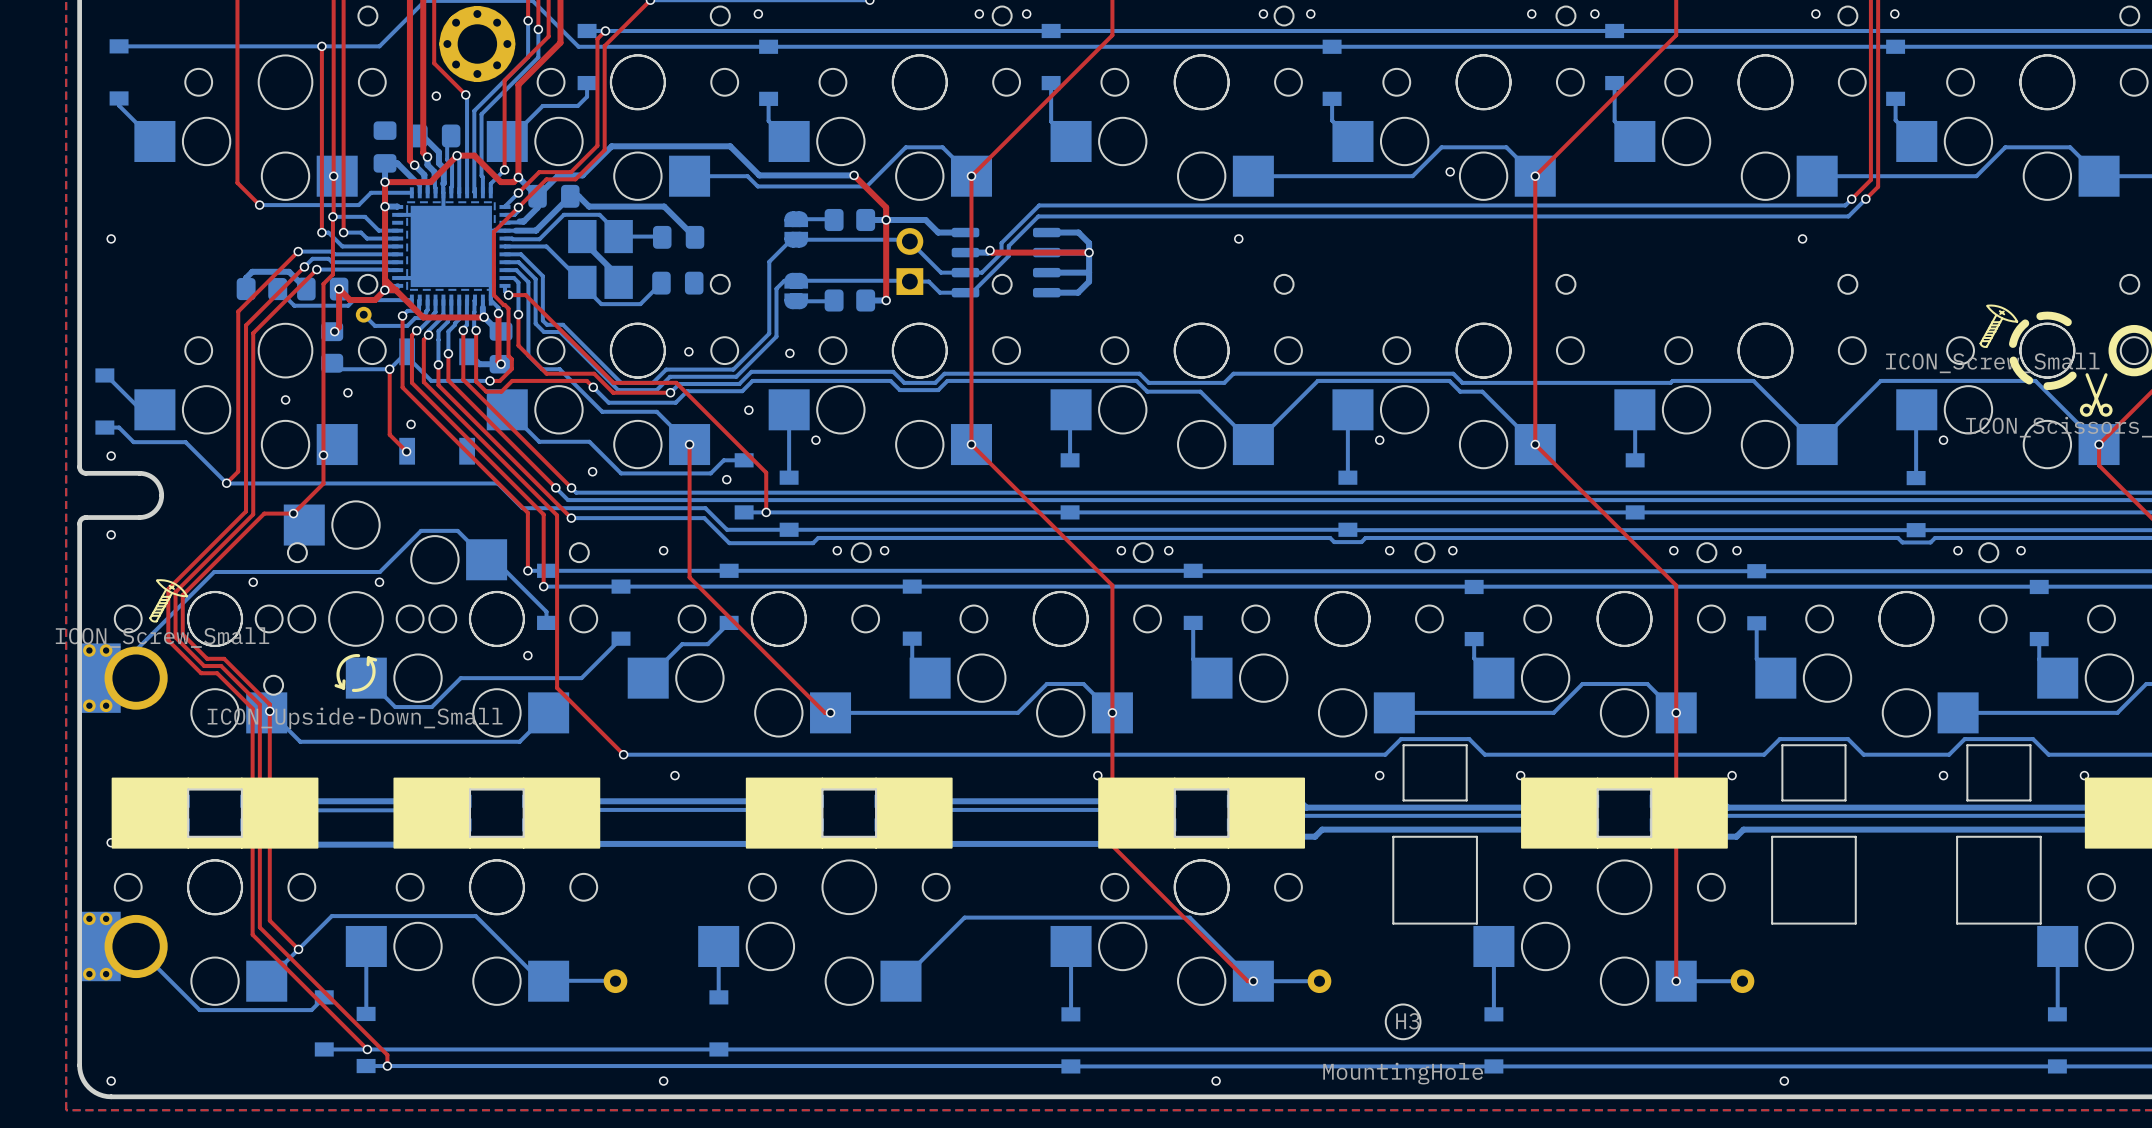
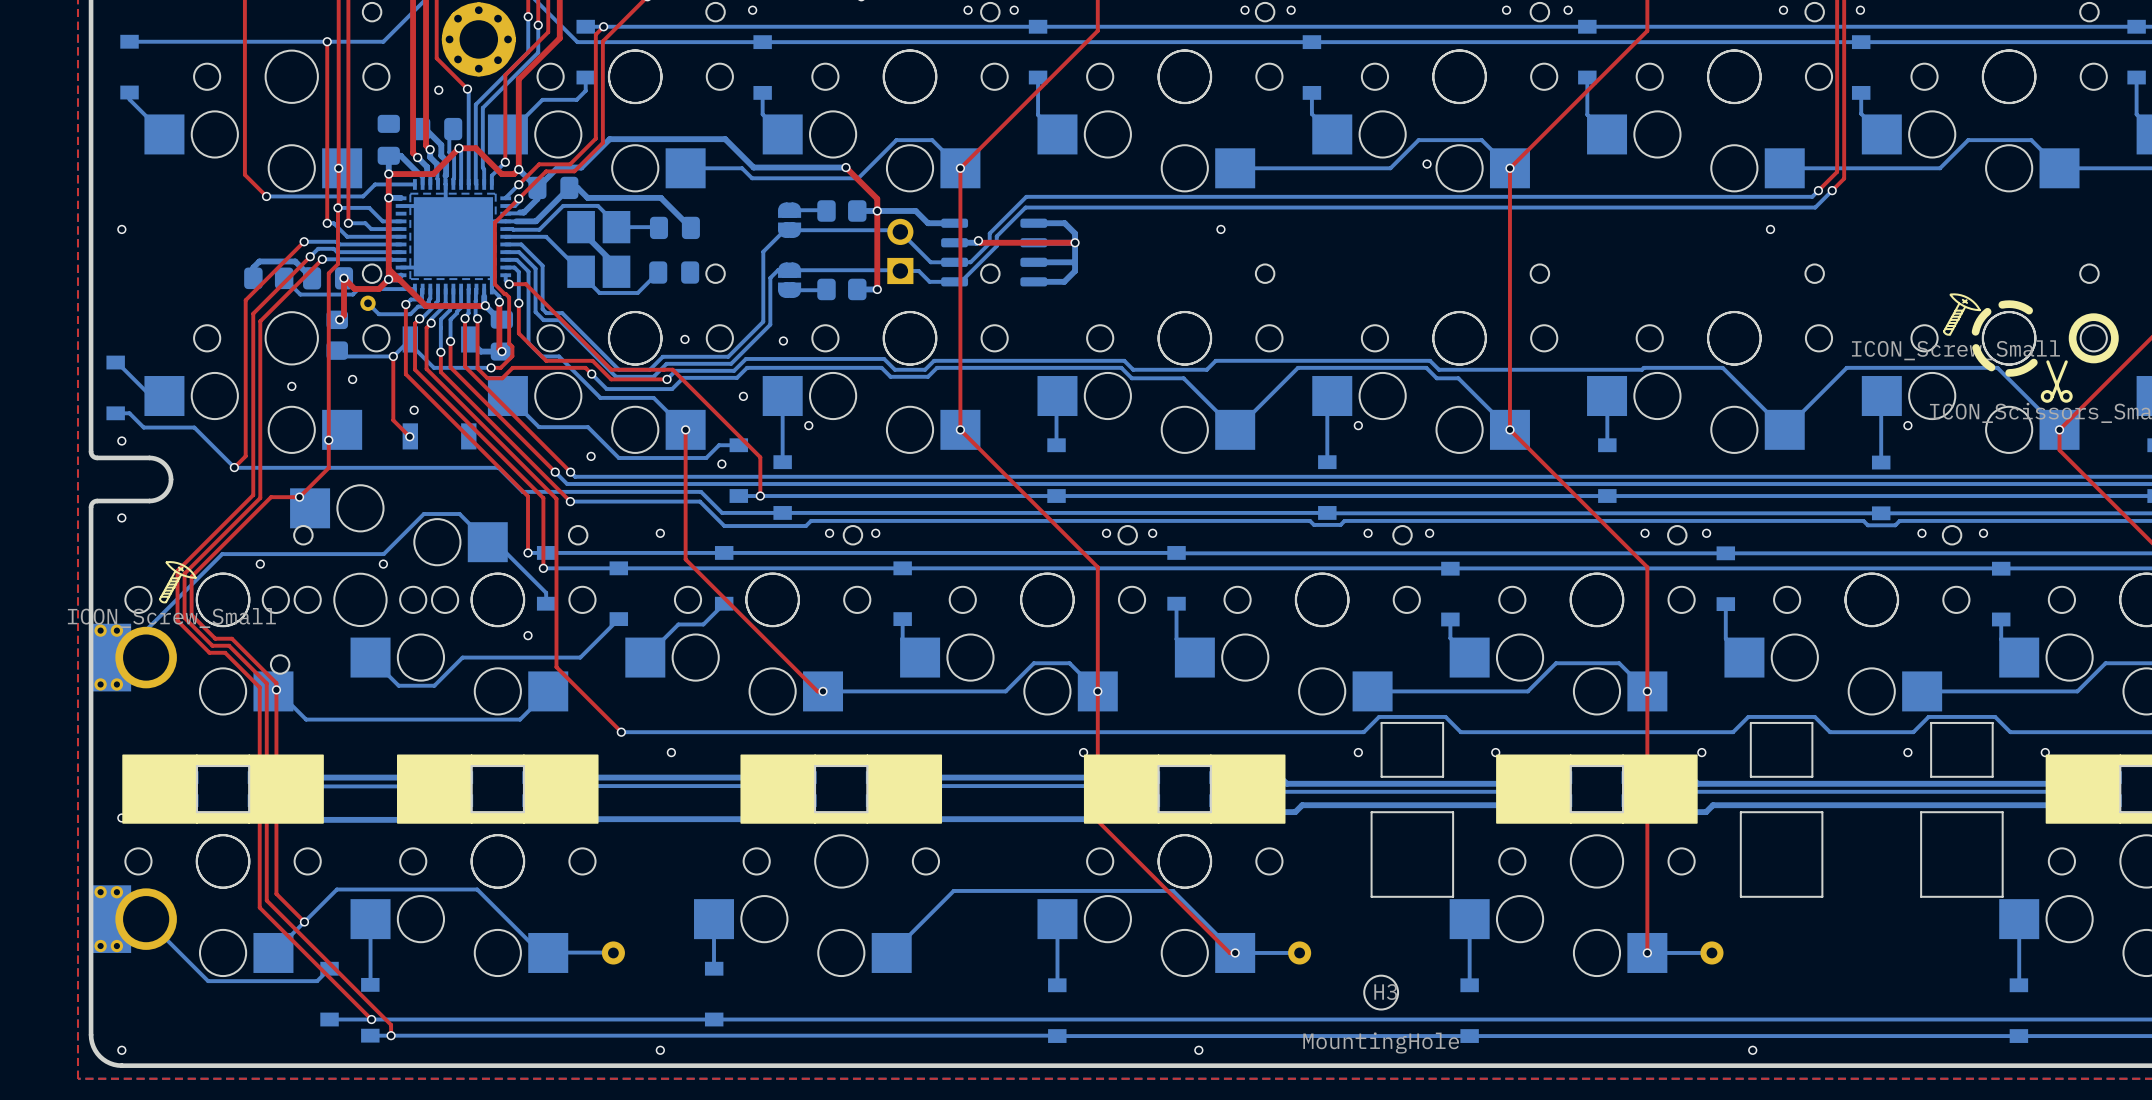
drawing: [334, 654, 378, 693] -> none

